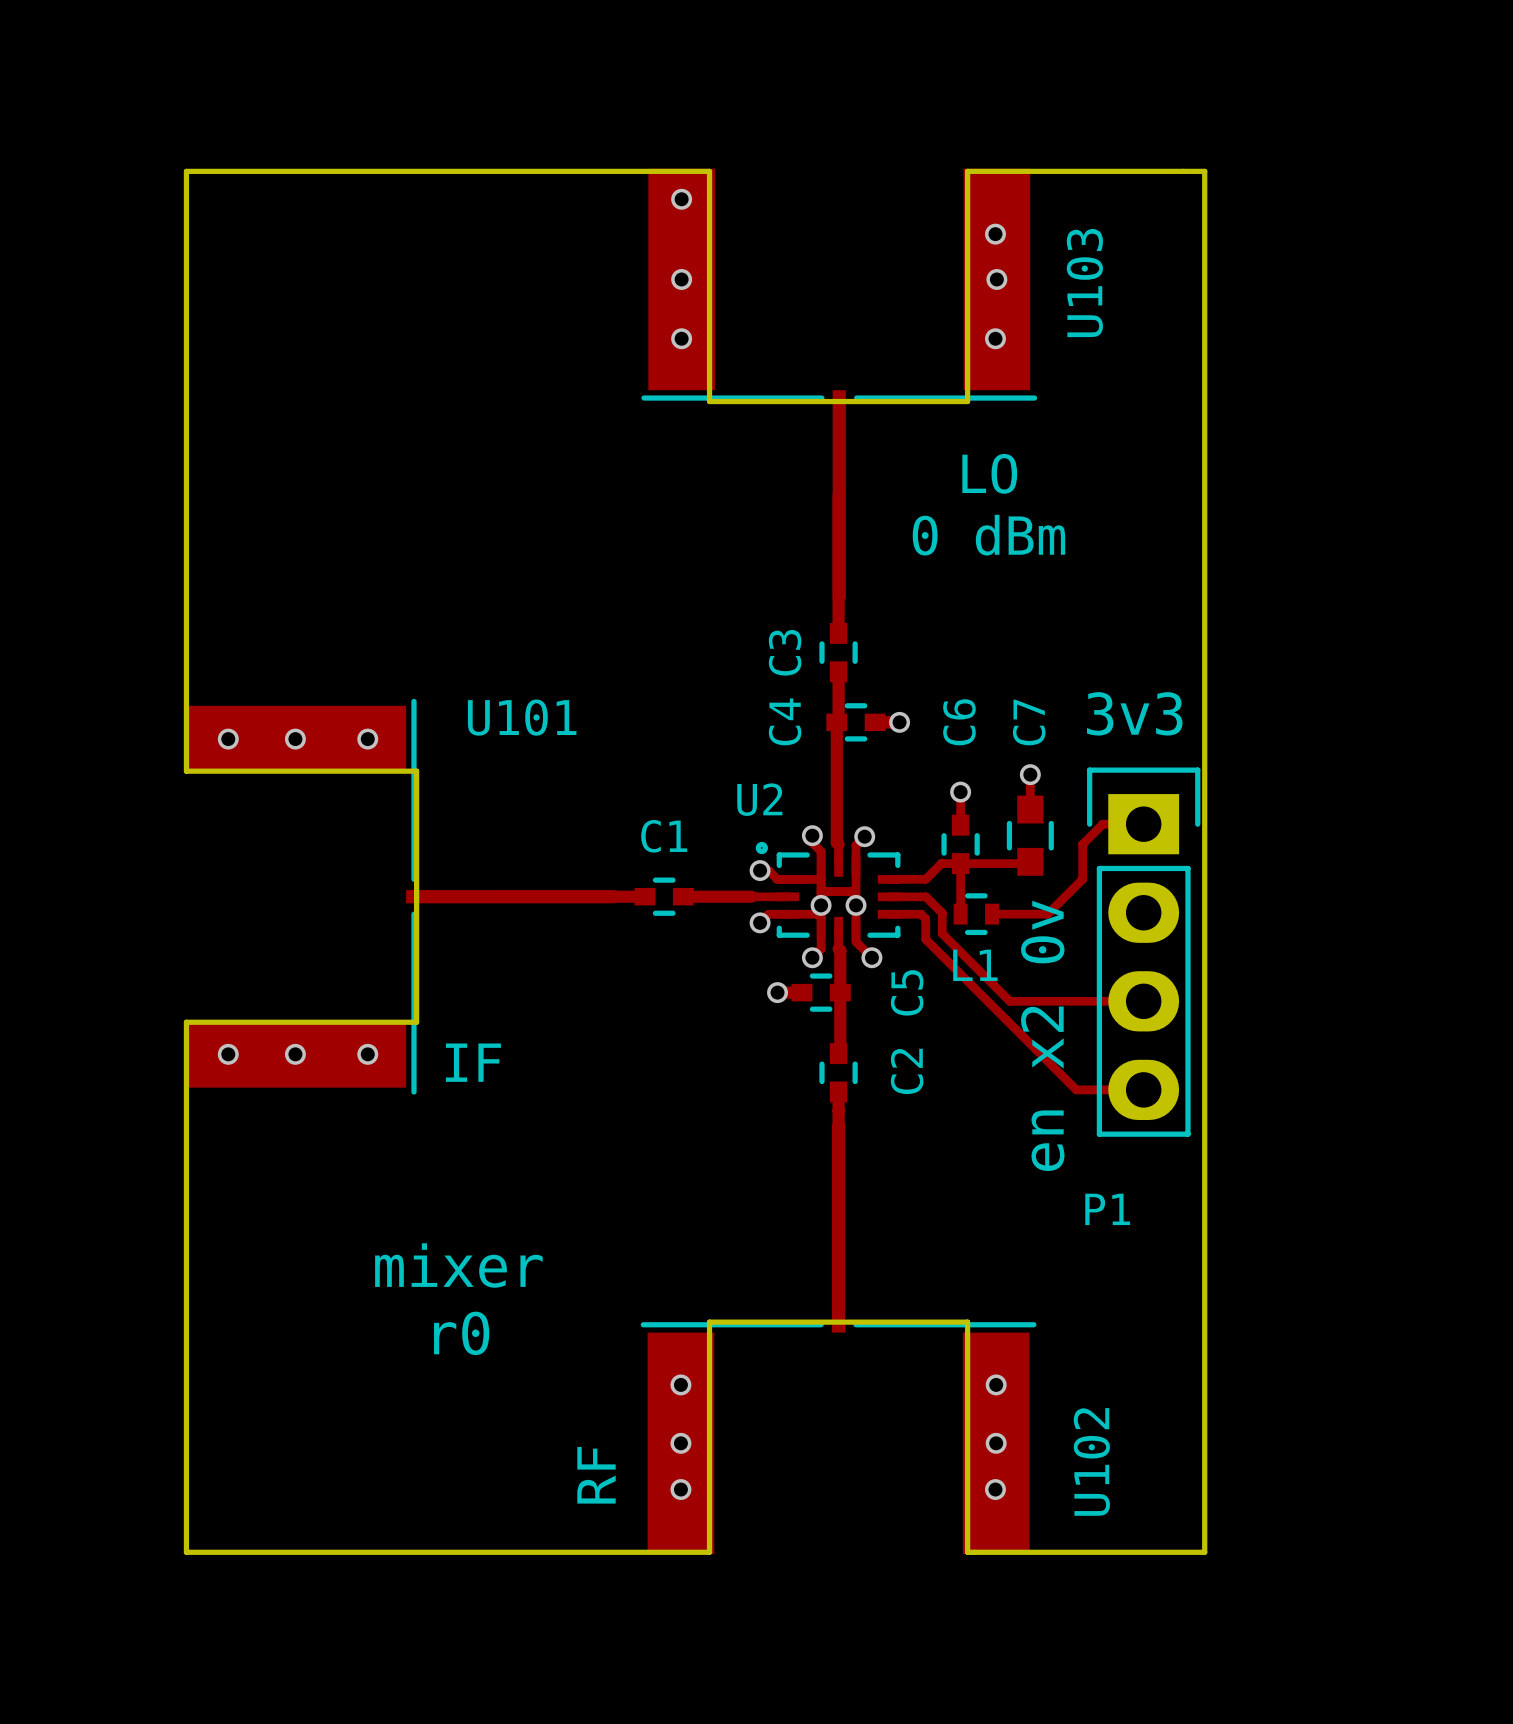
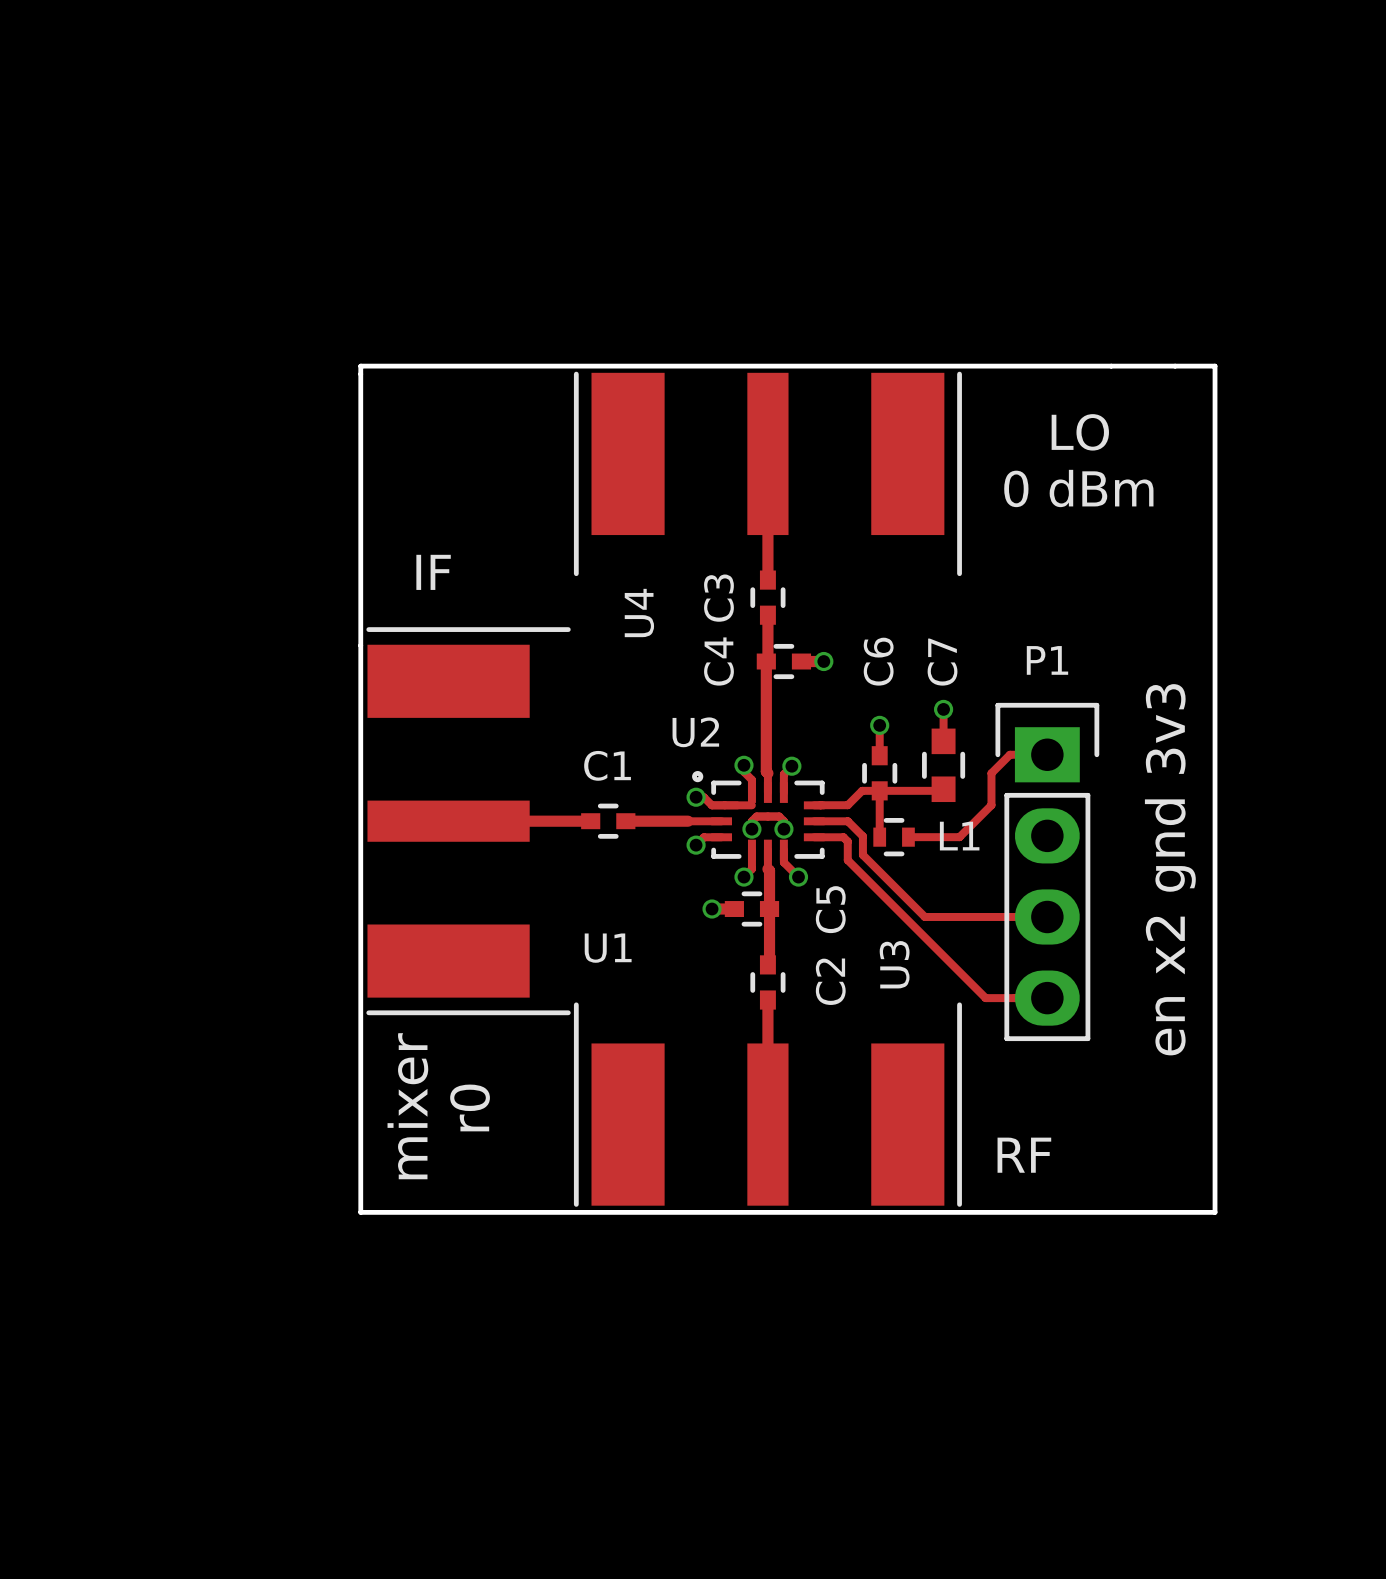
board edge: (186, 171) (709, 171) (709, 401) (967, 401) (967, 171) (1204, 171) (1204, 1552) (967, 1552) (967, 1322) (709, 1322) (709, 1552) (186, 1552) (186, 1022) (416, 1022) (416, 771) (186, 771) (186, 171) -> none
via: (681, 199) -> none
via: (995, 234) -> none
via: (681, 279) -> none
via: (996, 279) -> none
via: (681, 338) -> none
via: (995, 338) -> none
U103: (839, 384) -> none
board edge: none -> (360, 366) (360, 1212) (1215, 1212) (1215, 366) (360, 366)
text position: LO (989, 473) -> LO (1080, 432)
U4: none -> (767, 473)
text position: 0 dBm (988, 535) -> 0 dBm (1078, 488)
text: 3v3 (1134, 713) -> none
via: (228, 739) -> none
via: (295, 739) -> none
via: (367, 739) -> none
U101: (400, 896) -> none
U1: none -> (468, 821)
track: (787, 914) (817, 914) (821, 917) -> none
text: none -> en x2 gnd 3v3 (1170, 869)
L1 name position: L1 (975, 965) -> L1 (959, 836)
text: en x2 0v (1042, 1035) -> none
via: (228, 1054) -> none
via: (295, 1054) -> none
via: (367, 1054) -> none
text position: IF (473, 1062) -> IF (433, 572)
U3: none -> (767, 1104)
P1 name position: P1 (1107, 1209) -> P1 (1047, 660)
text rotation: 0° (458, 1265) -> 90° counterclockwise (407, 1106)
text rotation: 0° (461, 1333) -> 90° counterclockwise (470, 1107)
text position: r0 (461, 1333) -> r0 (470, 1107)
U102: (838, 1338) -> none
via: (680, 1384) -> none
via: (996, 1384) -> none
via: (680, 1443) -> none
via: (996, 1443) -> none
text rotation: 0° (596, 1475) -> 90° clockwise (1024, 1155)
text position: RF (596, 1475) -> RF (1024, 1155)
via: (680, 1489) -> none
via: (995, 1489) -> none

